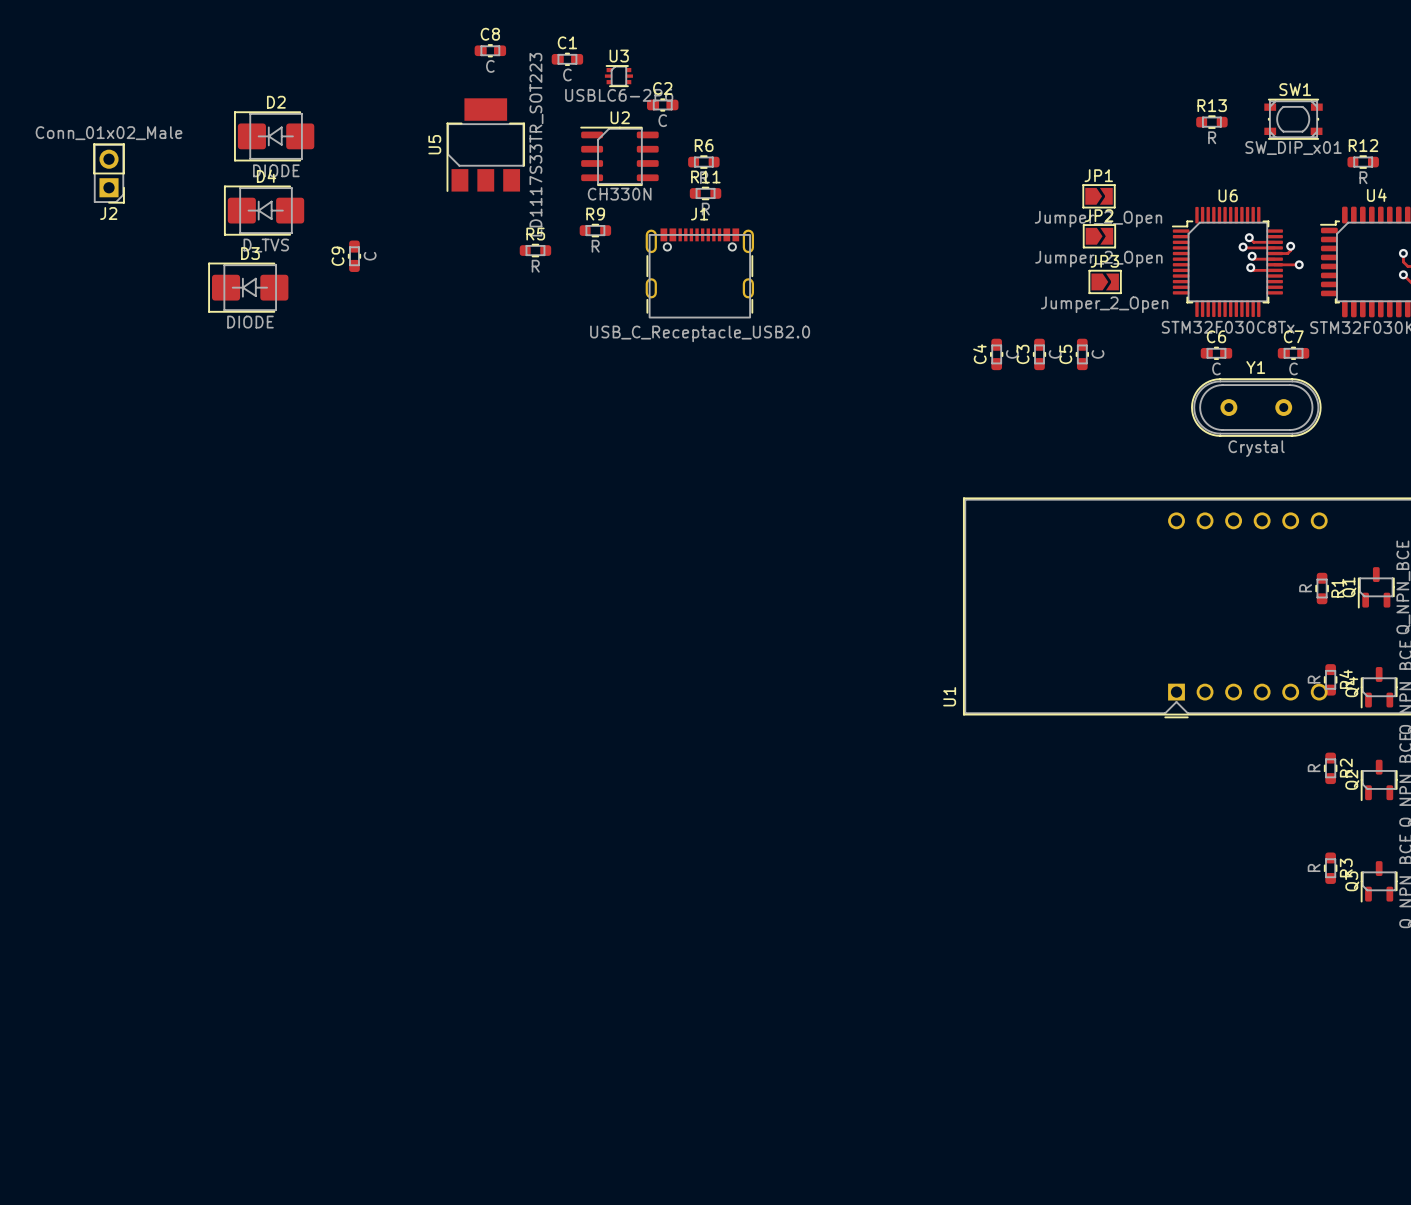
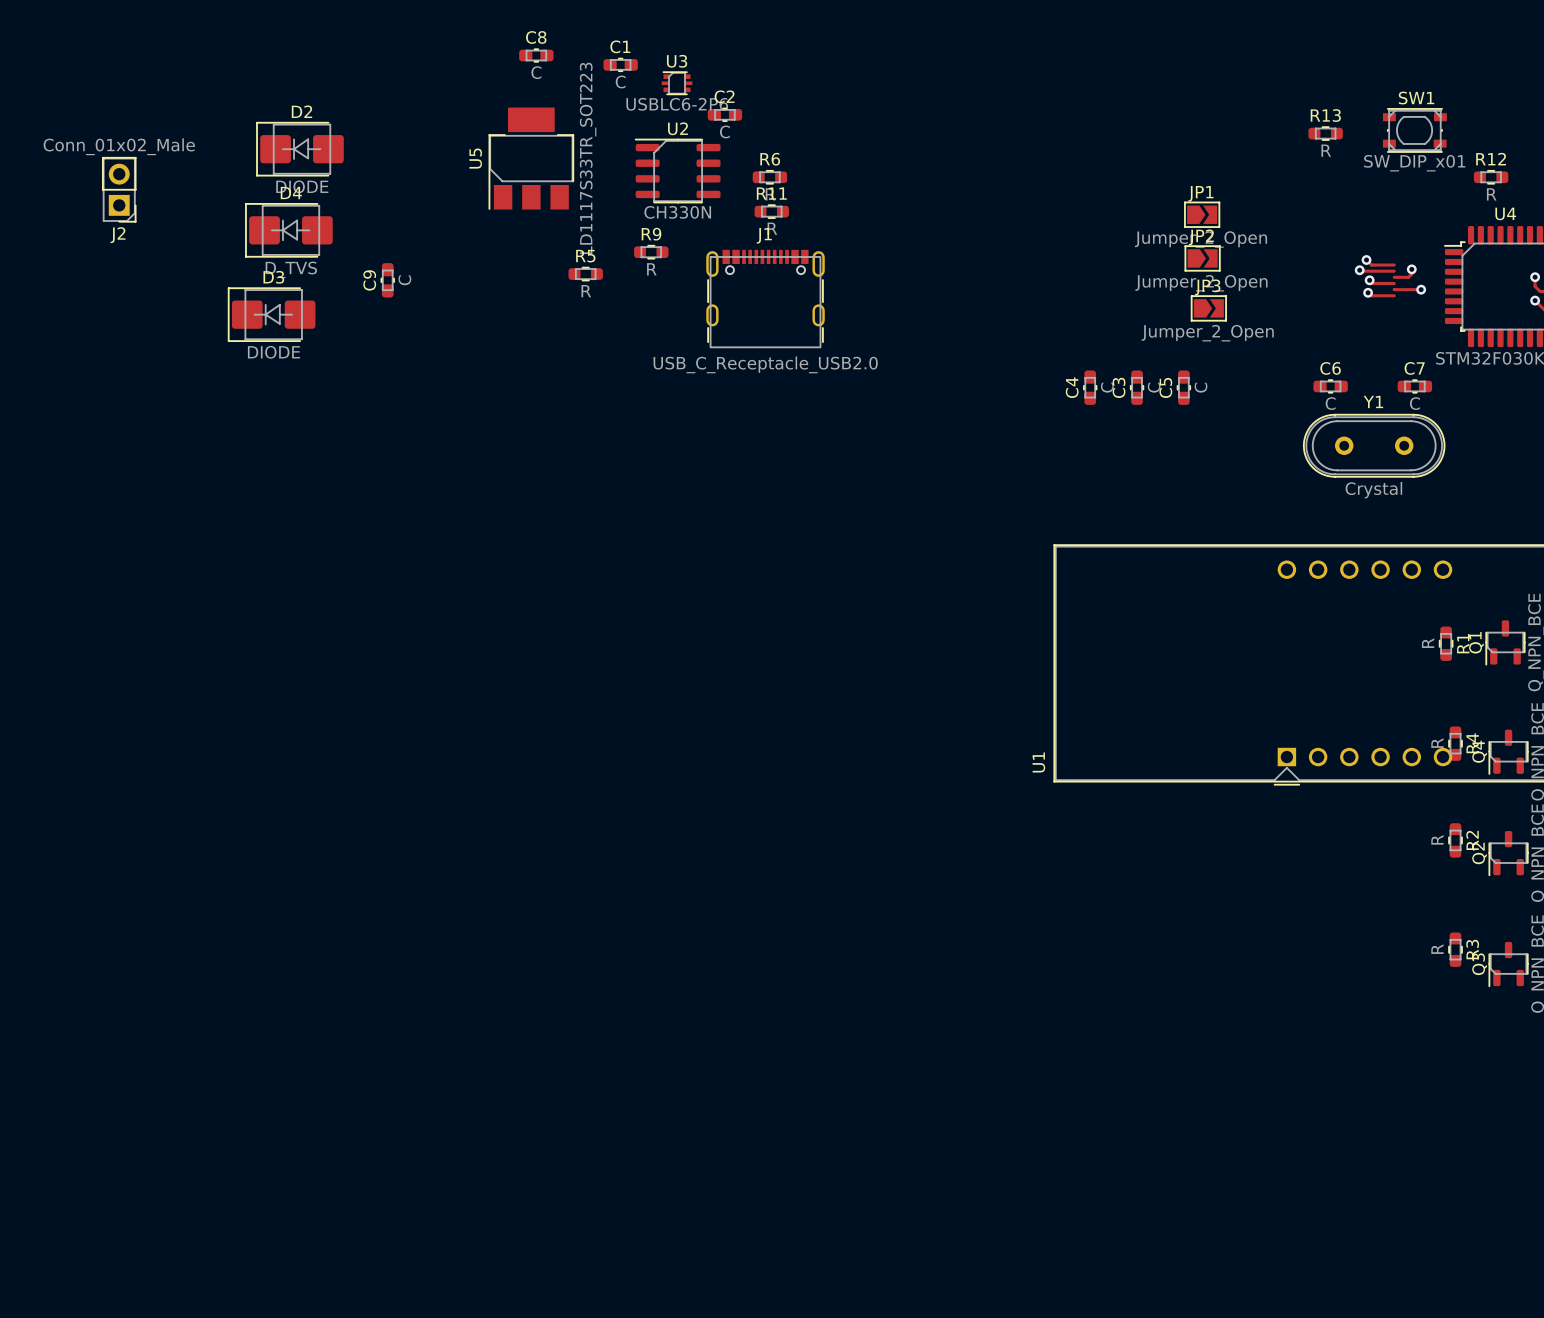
U6: STM32F030C8Tx (1227, 261) -> none

